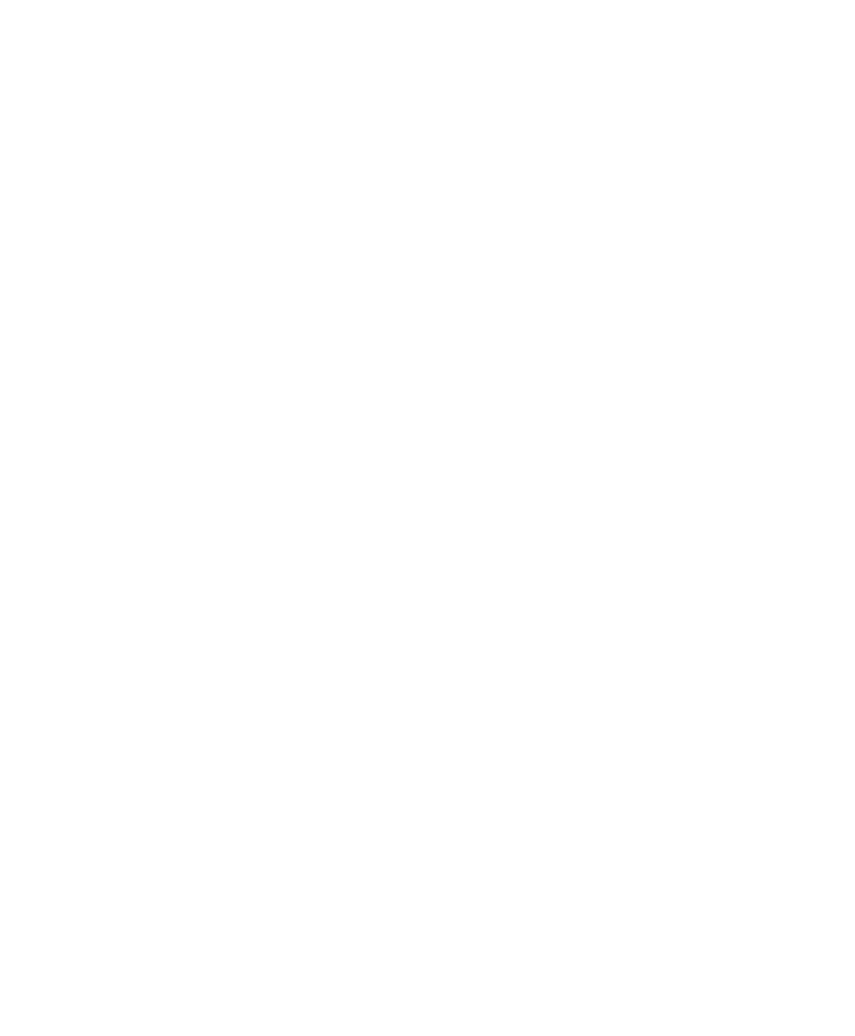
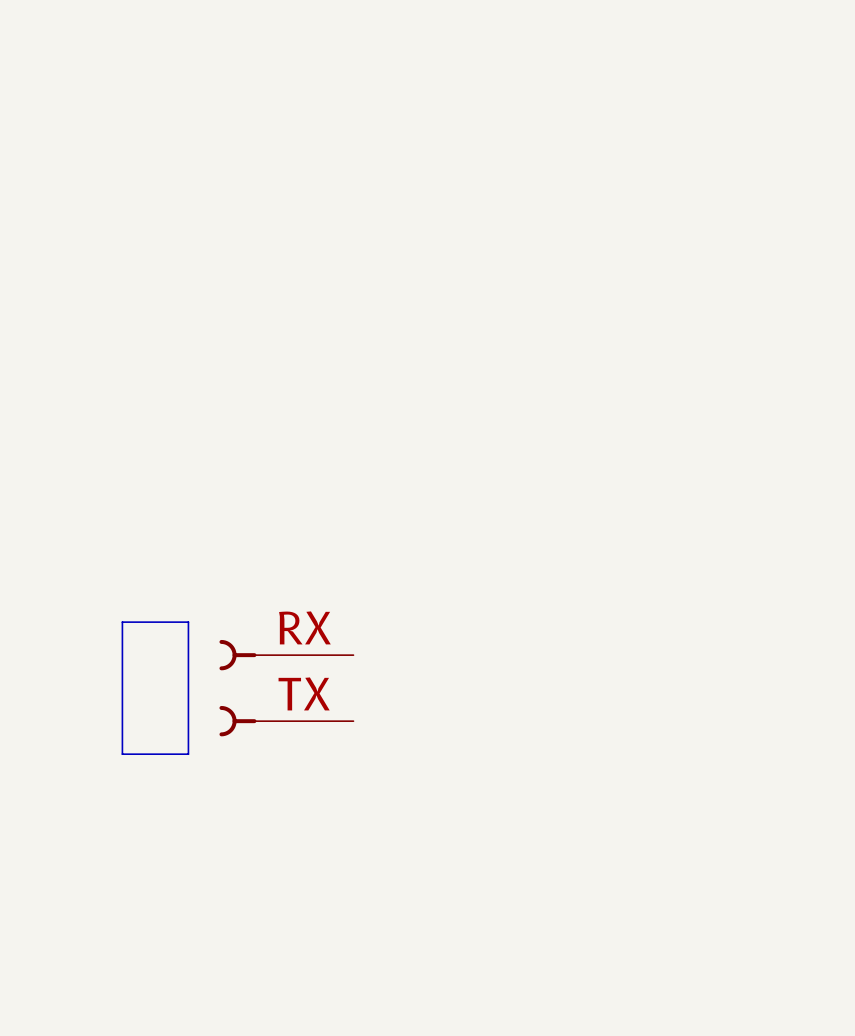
line: none -> (122, 622) (188, 622) (188, 754) (122, 754) (122, 622)
part: none -> (286, 688)

